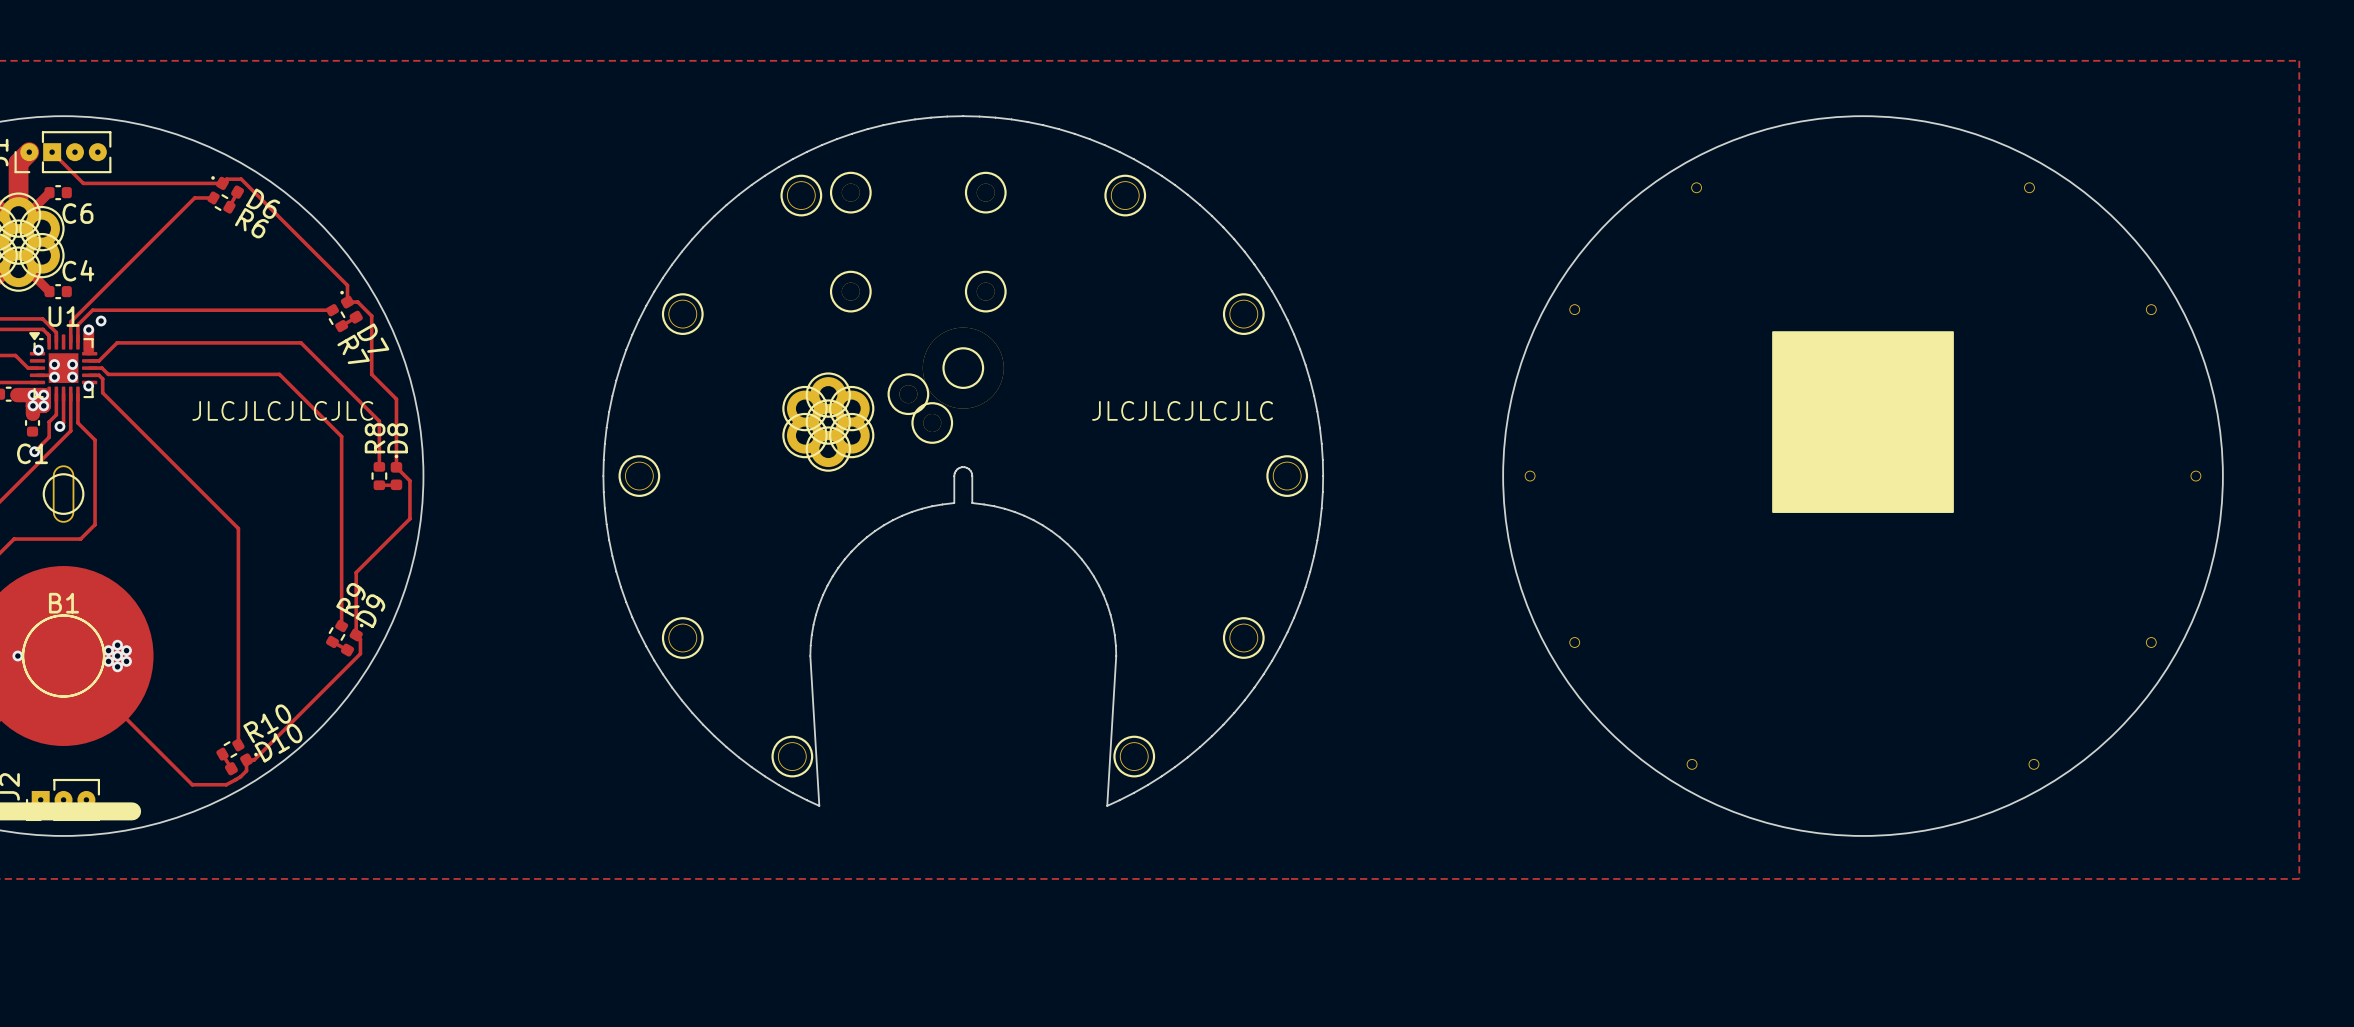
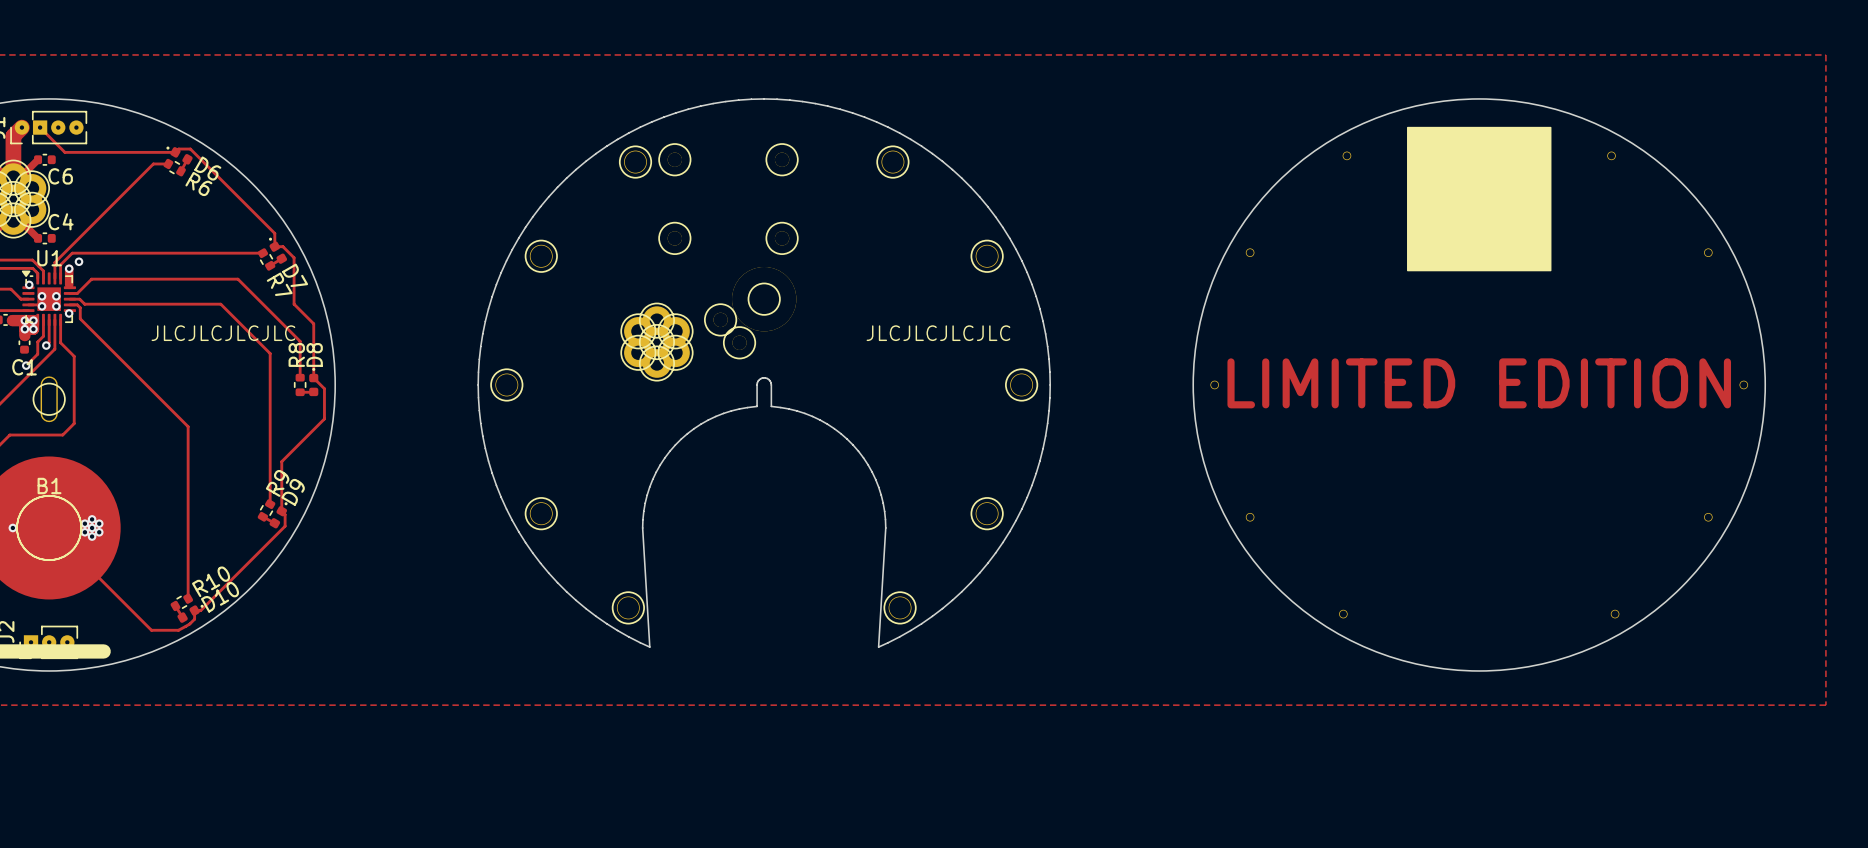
drawing position: (1863, 422) -> (1479, 199)
text: none -> LIMITED EDITION (1479, 383)

